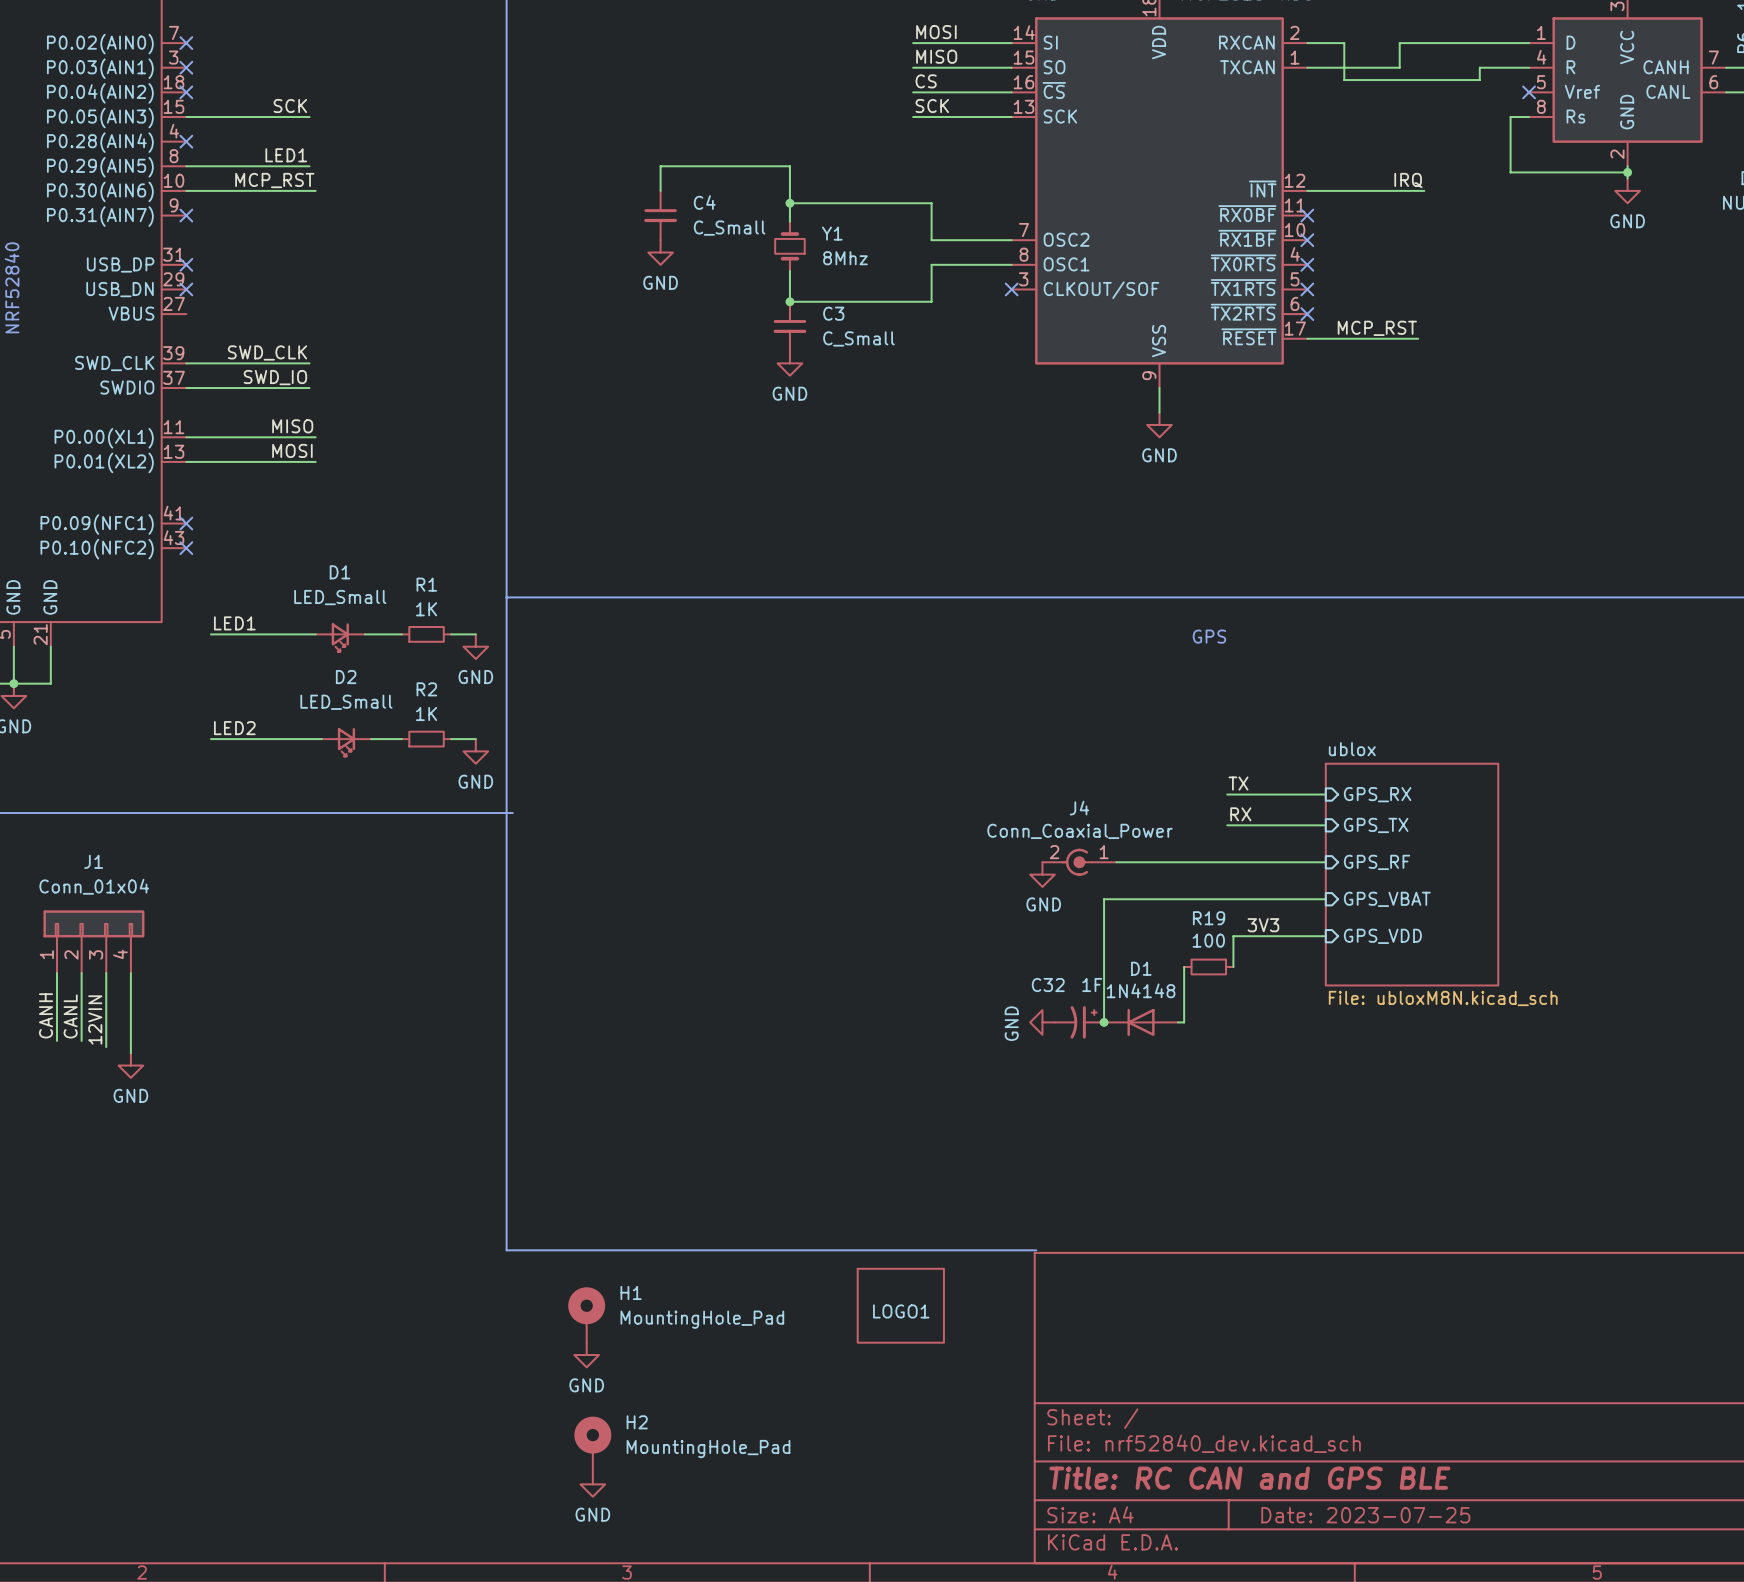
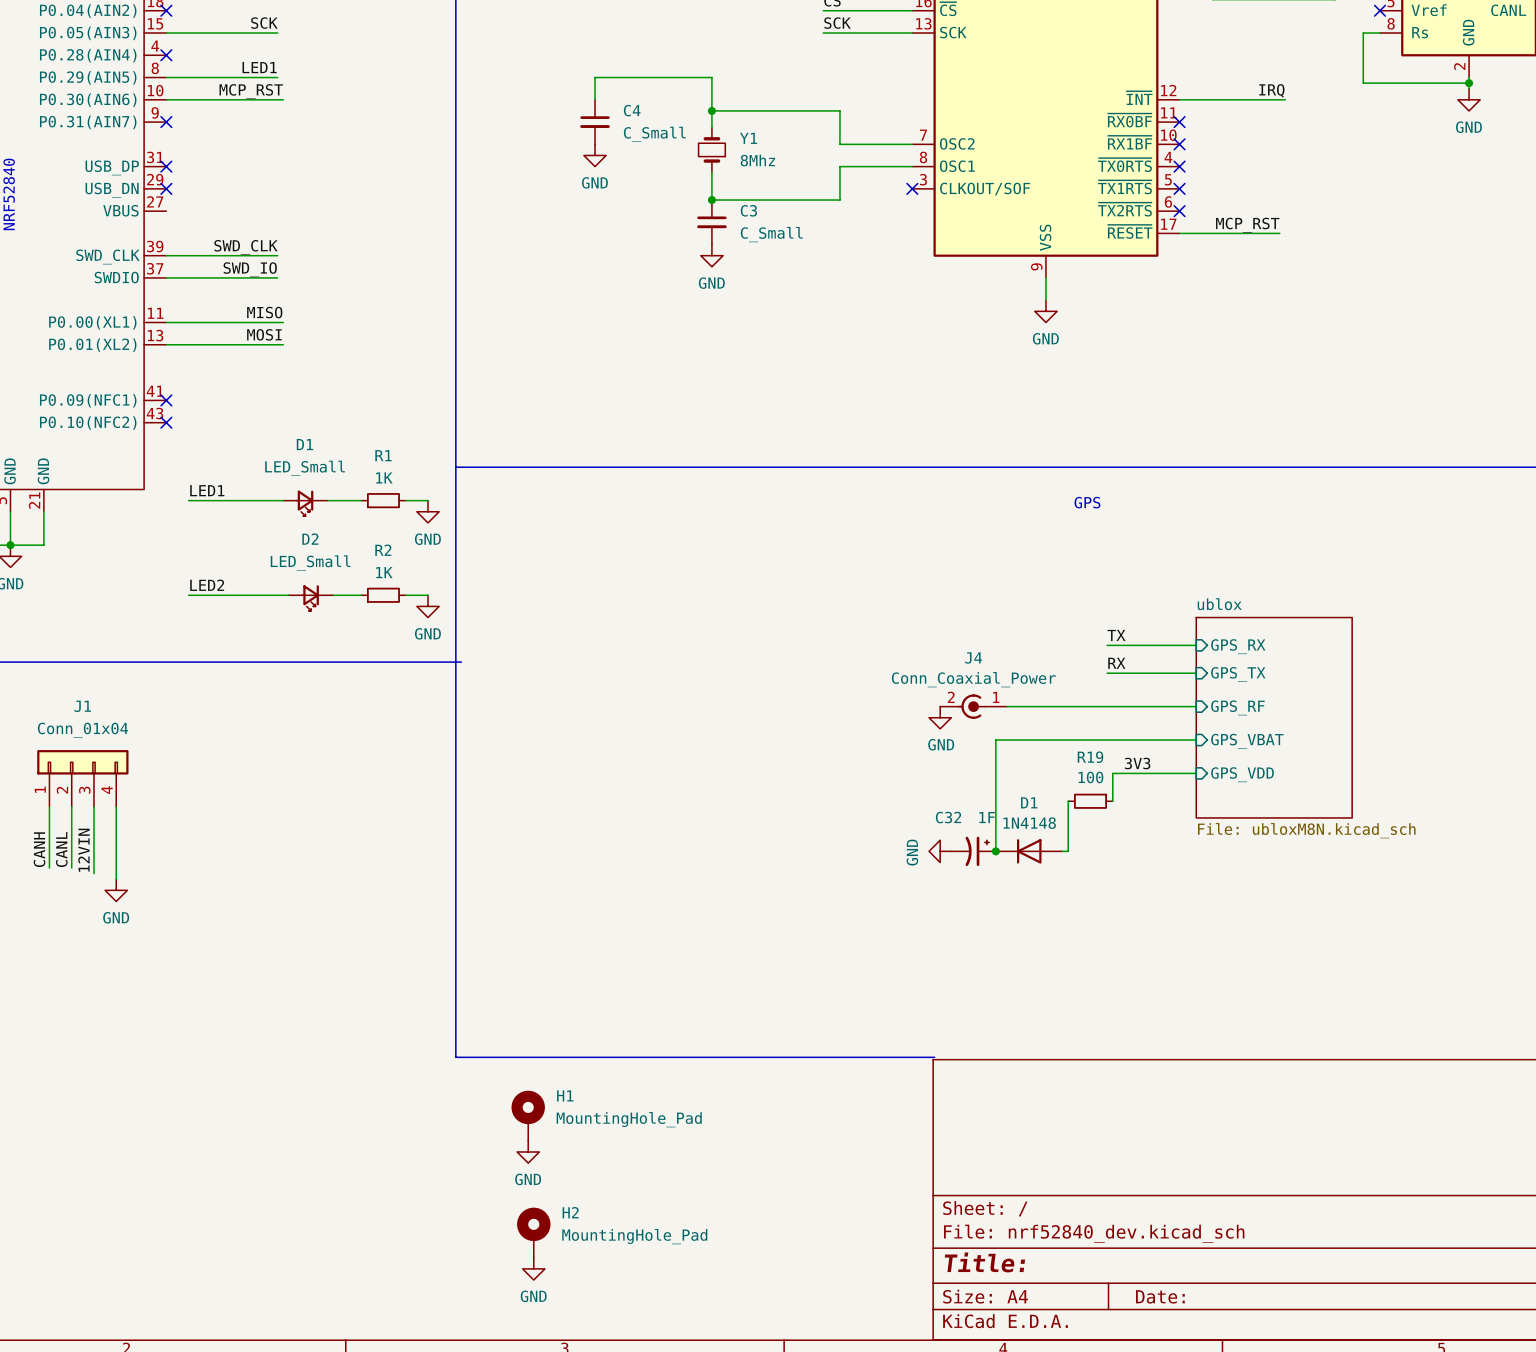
LOGO1: (900, 1305) -> none
title block: Title: RC CAN and GPS BLE (1249, 1478) -> Title: (984, 1262)
title block: Date: 2023-07-25 (1365, 1515) -> Date: (1160, 1296)

